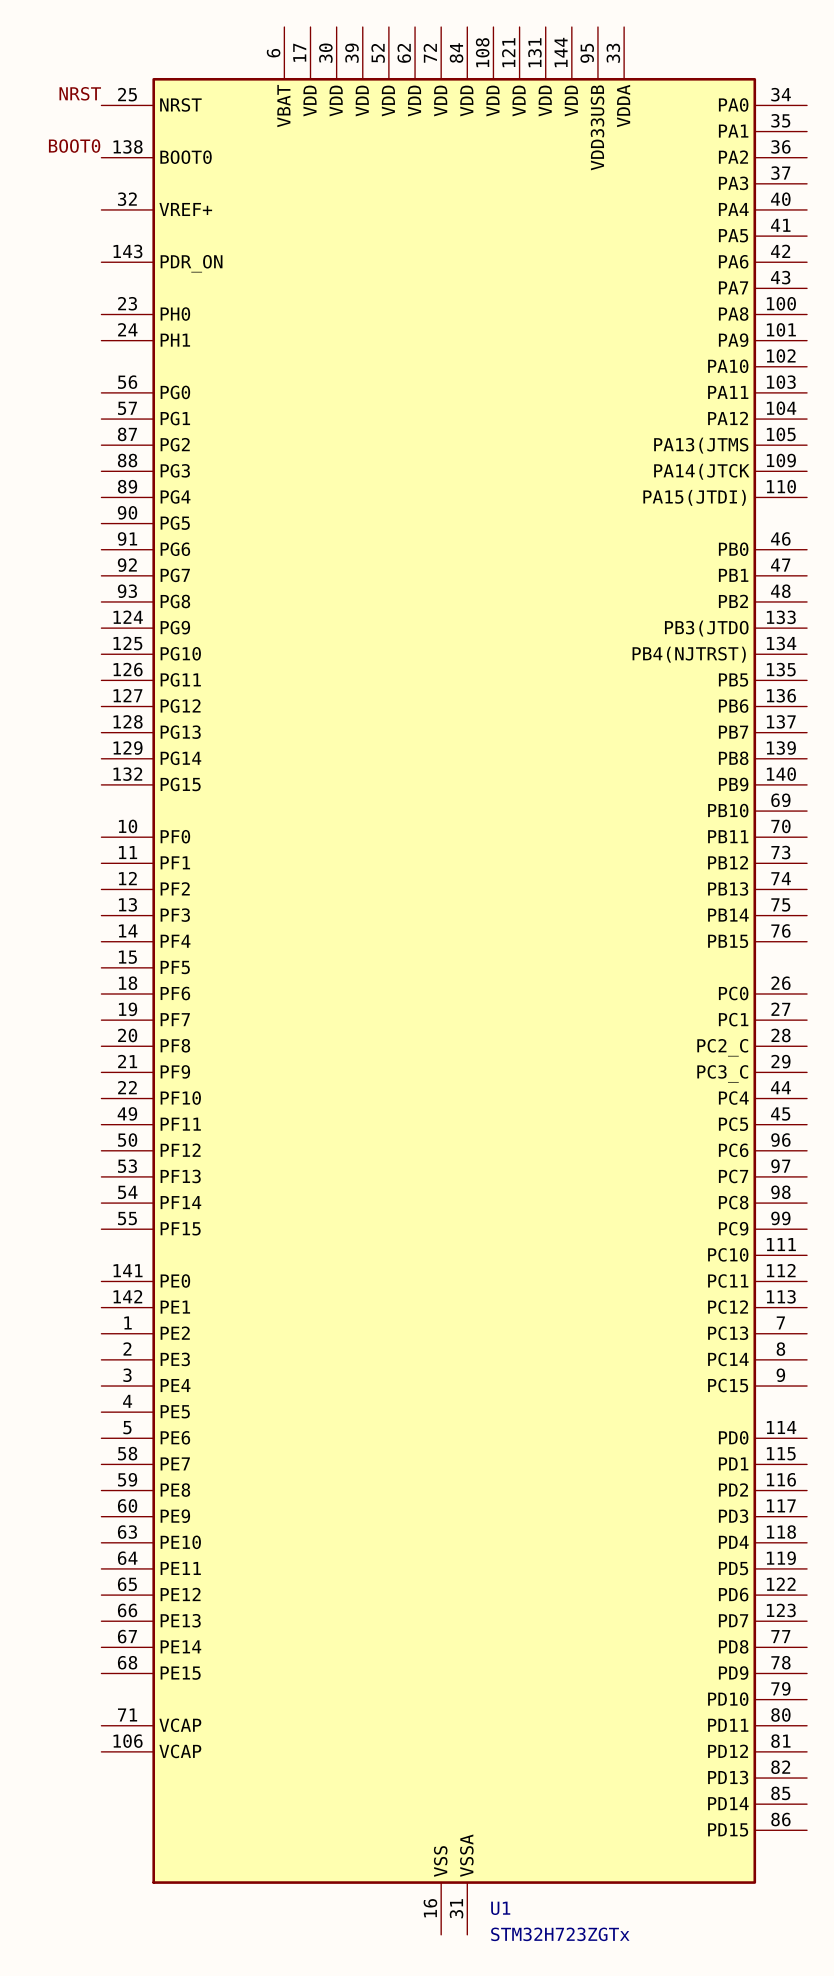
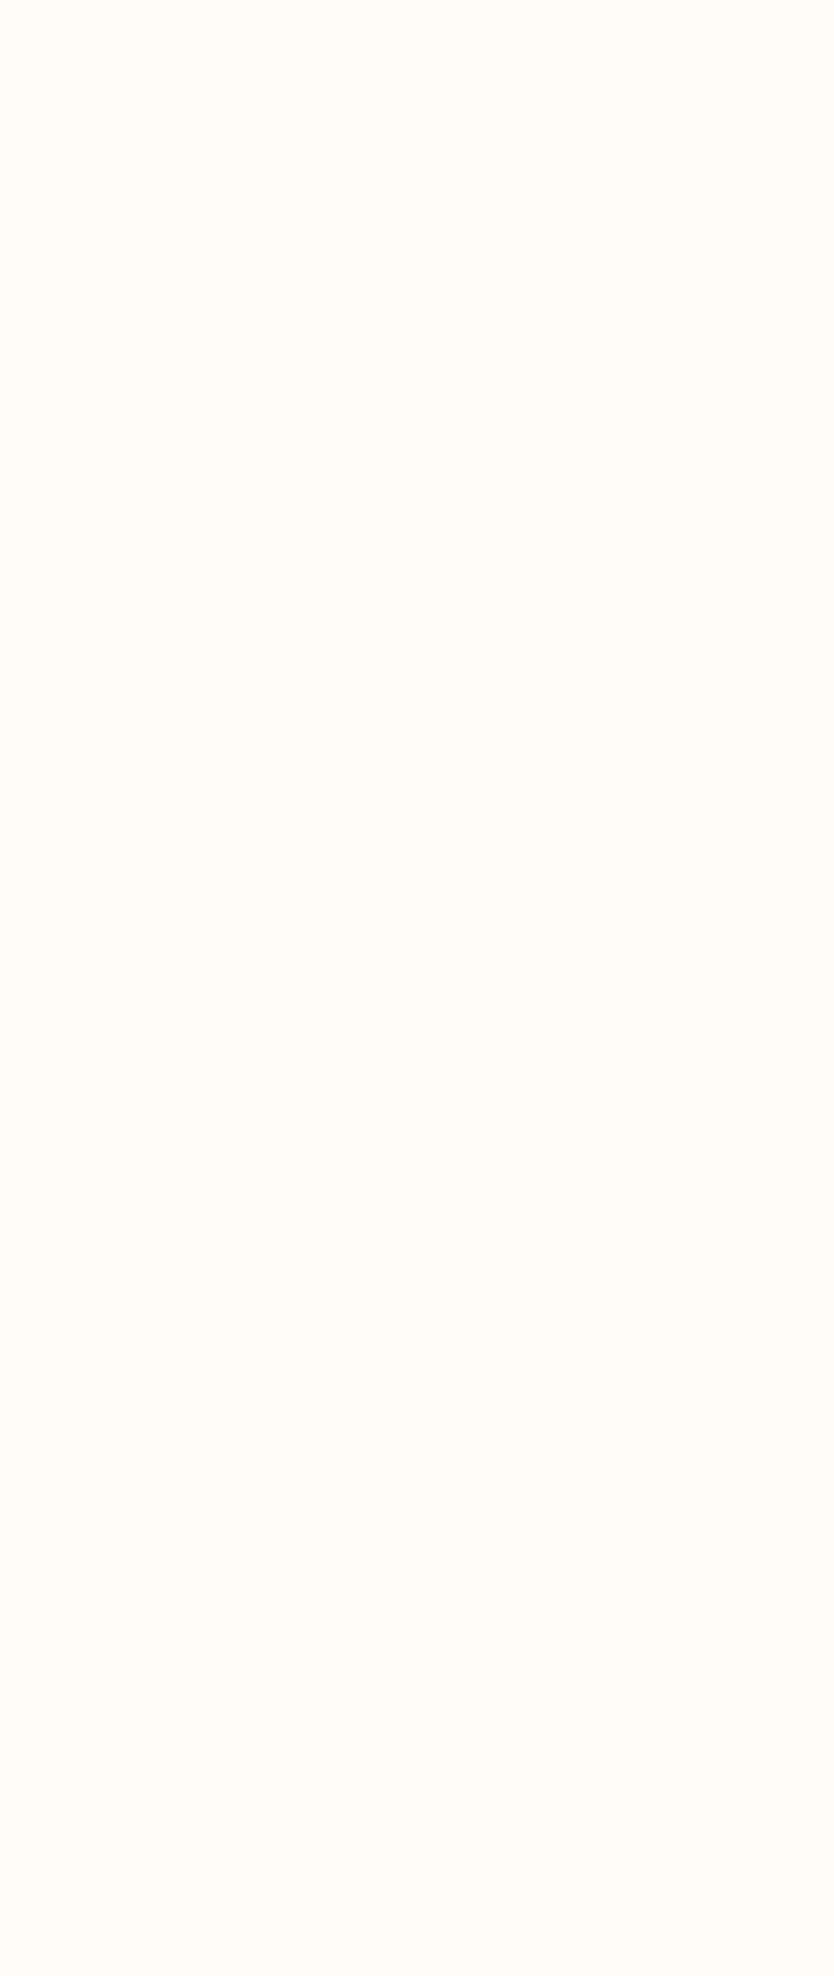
label: NRST (80, 93) -> none
label: BOOT0 (74, 146) -> none
U1: STM32H723ZGTx (454, 980) -> none

